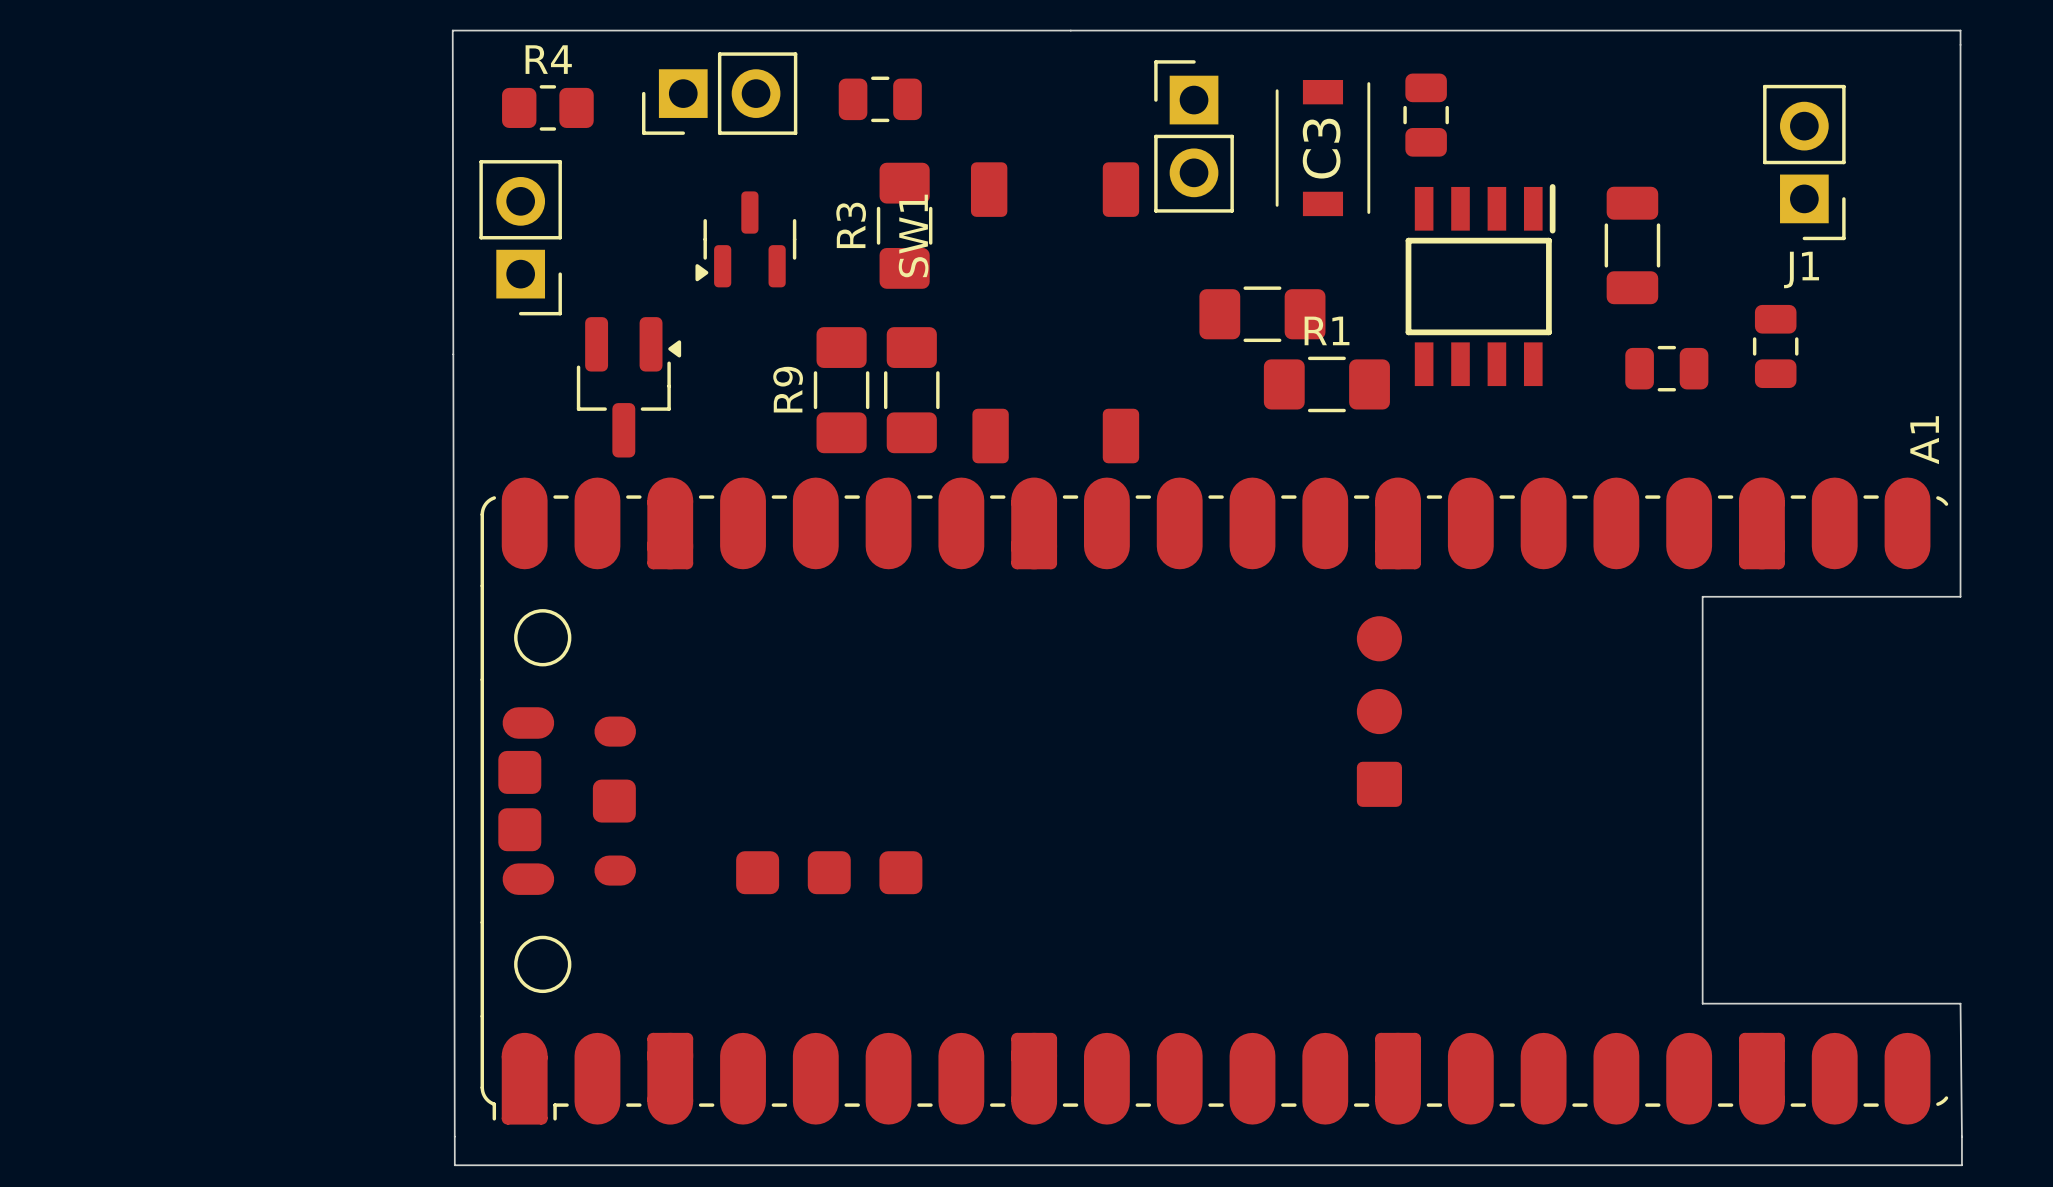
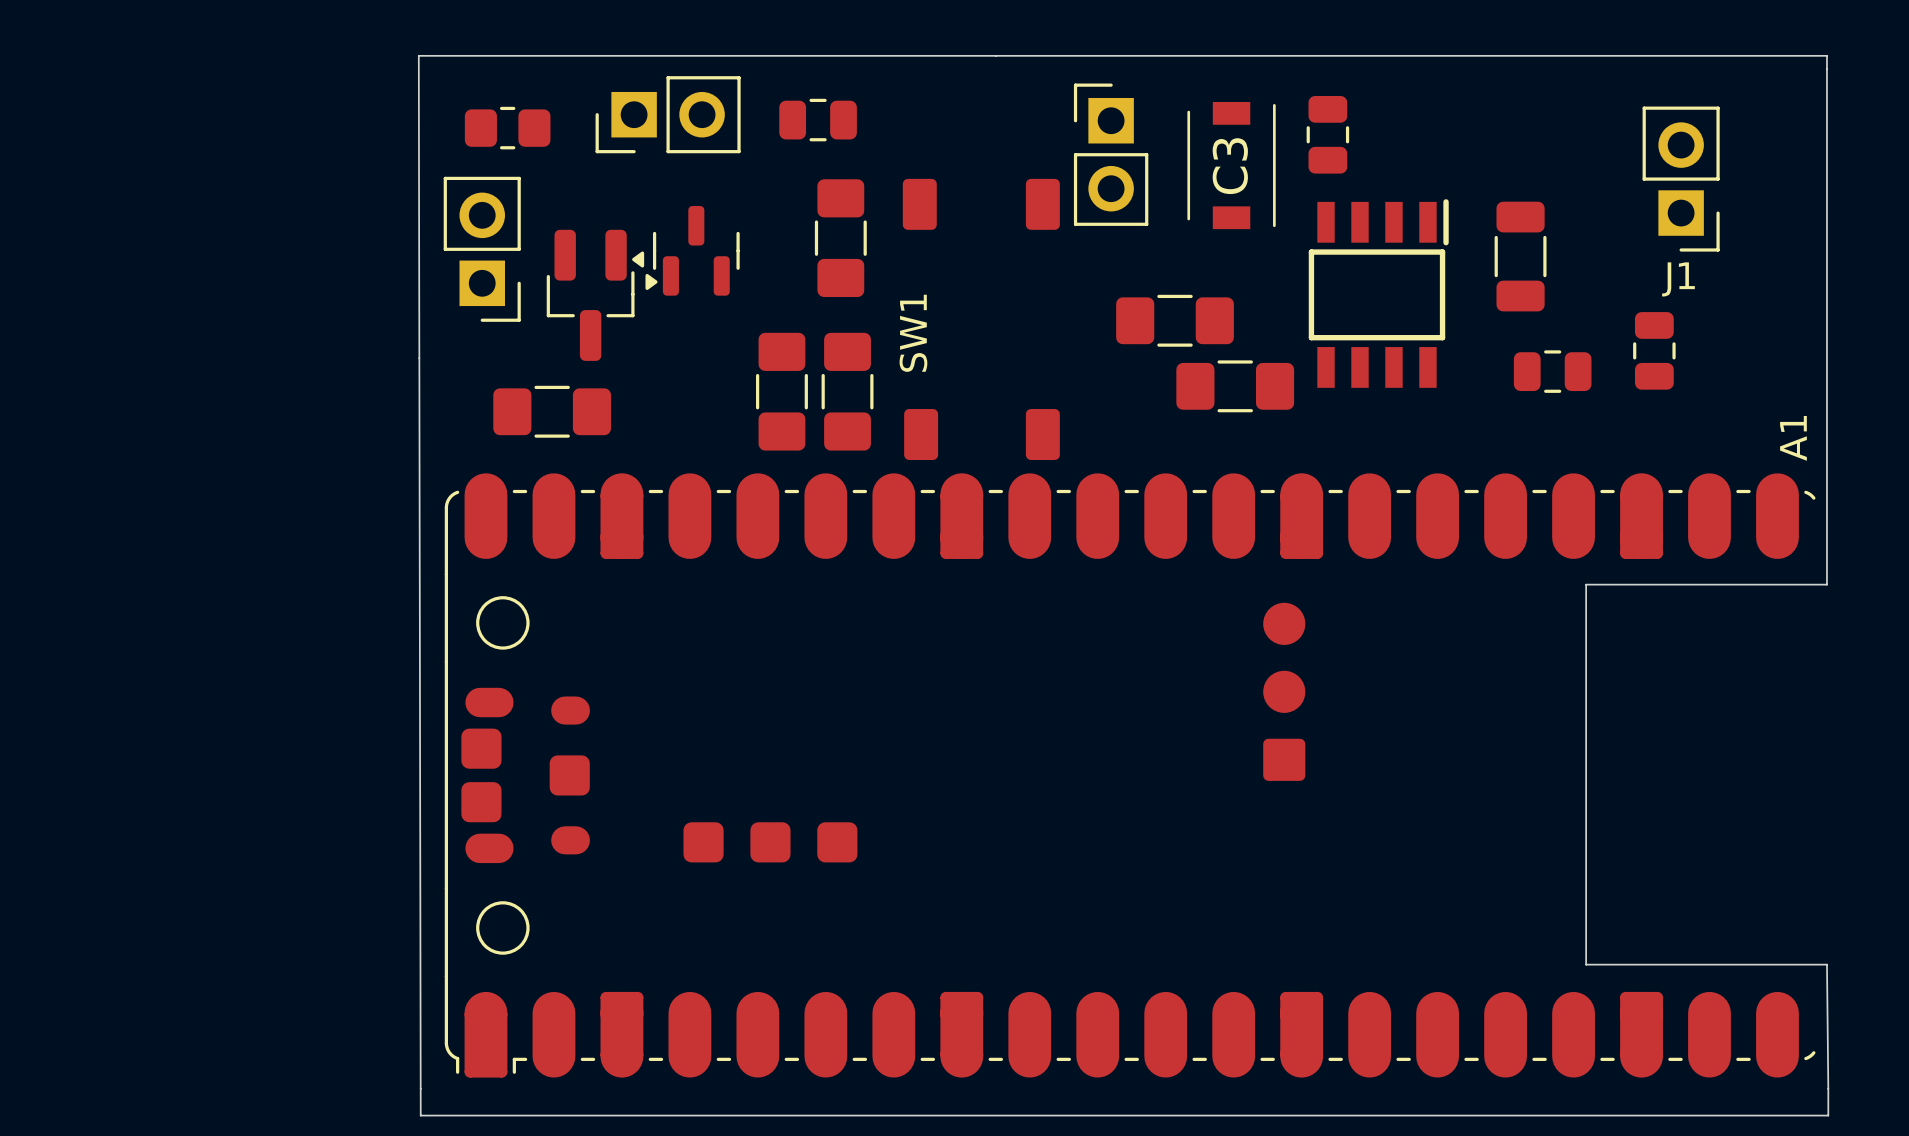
R4 name: R4 (548, 59) -> none
R3 name: R3 (851, 225) -> none
SW1 name position: SW1 (913, 235) -> SW1 (913, 333)
R1 name: R1 (1327, 330) -> none
part position: (628, 387) -> (595, 295)
R9 name: R9 (788, 389) -> none
part: none -> (552, 411)

